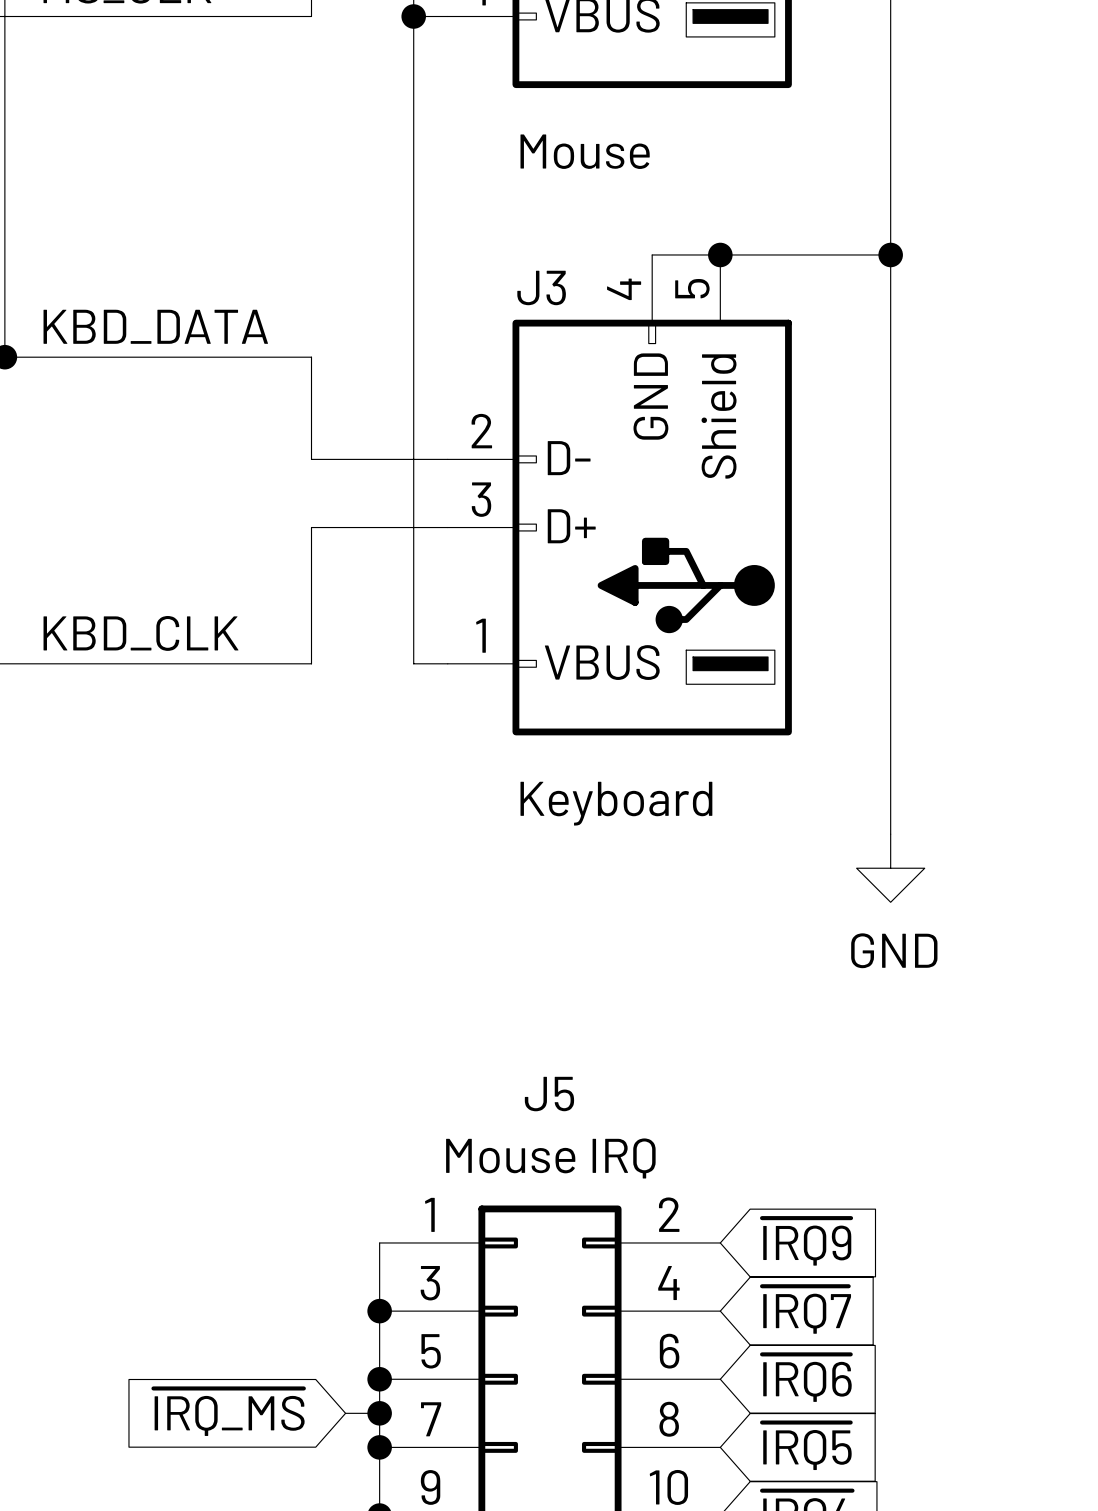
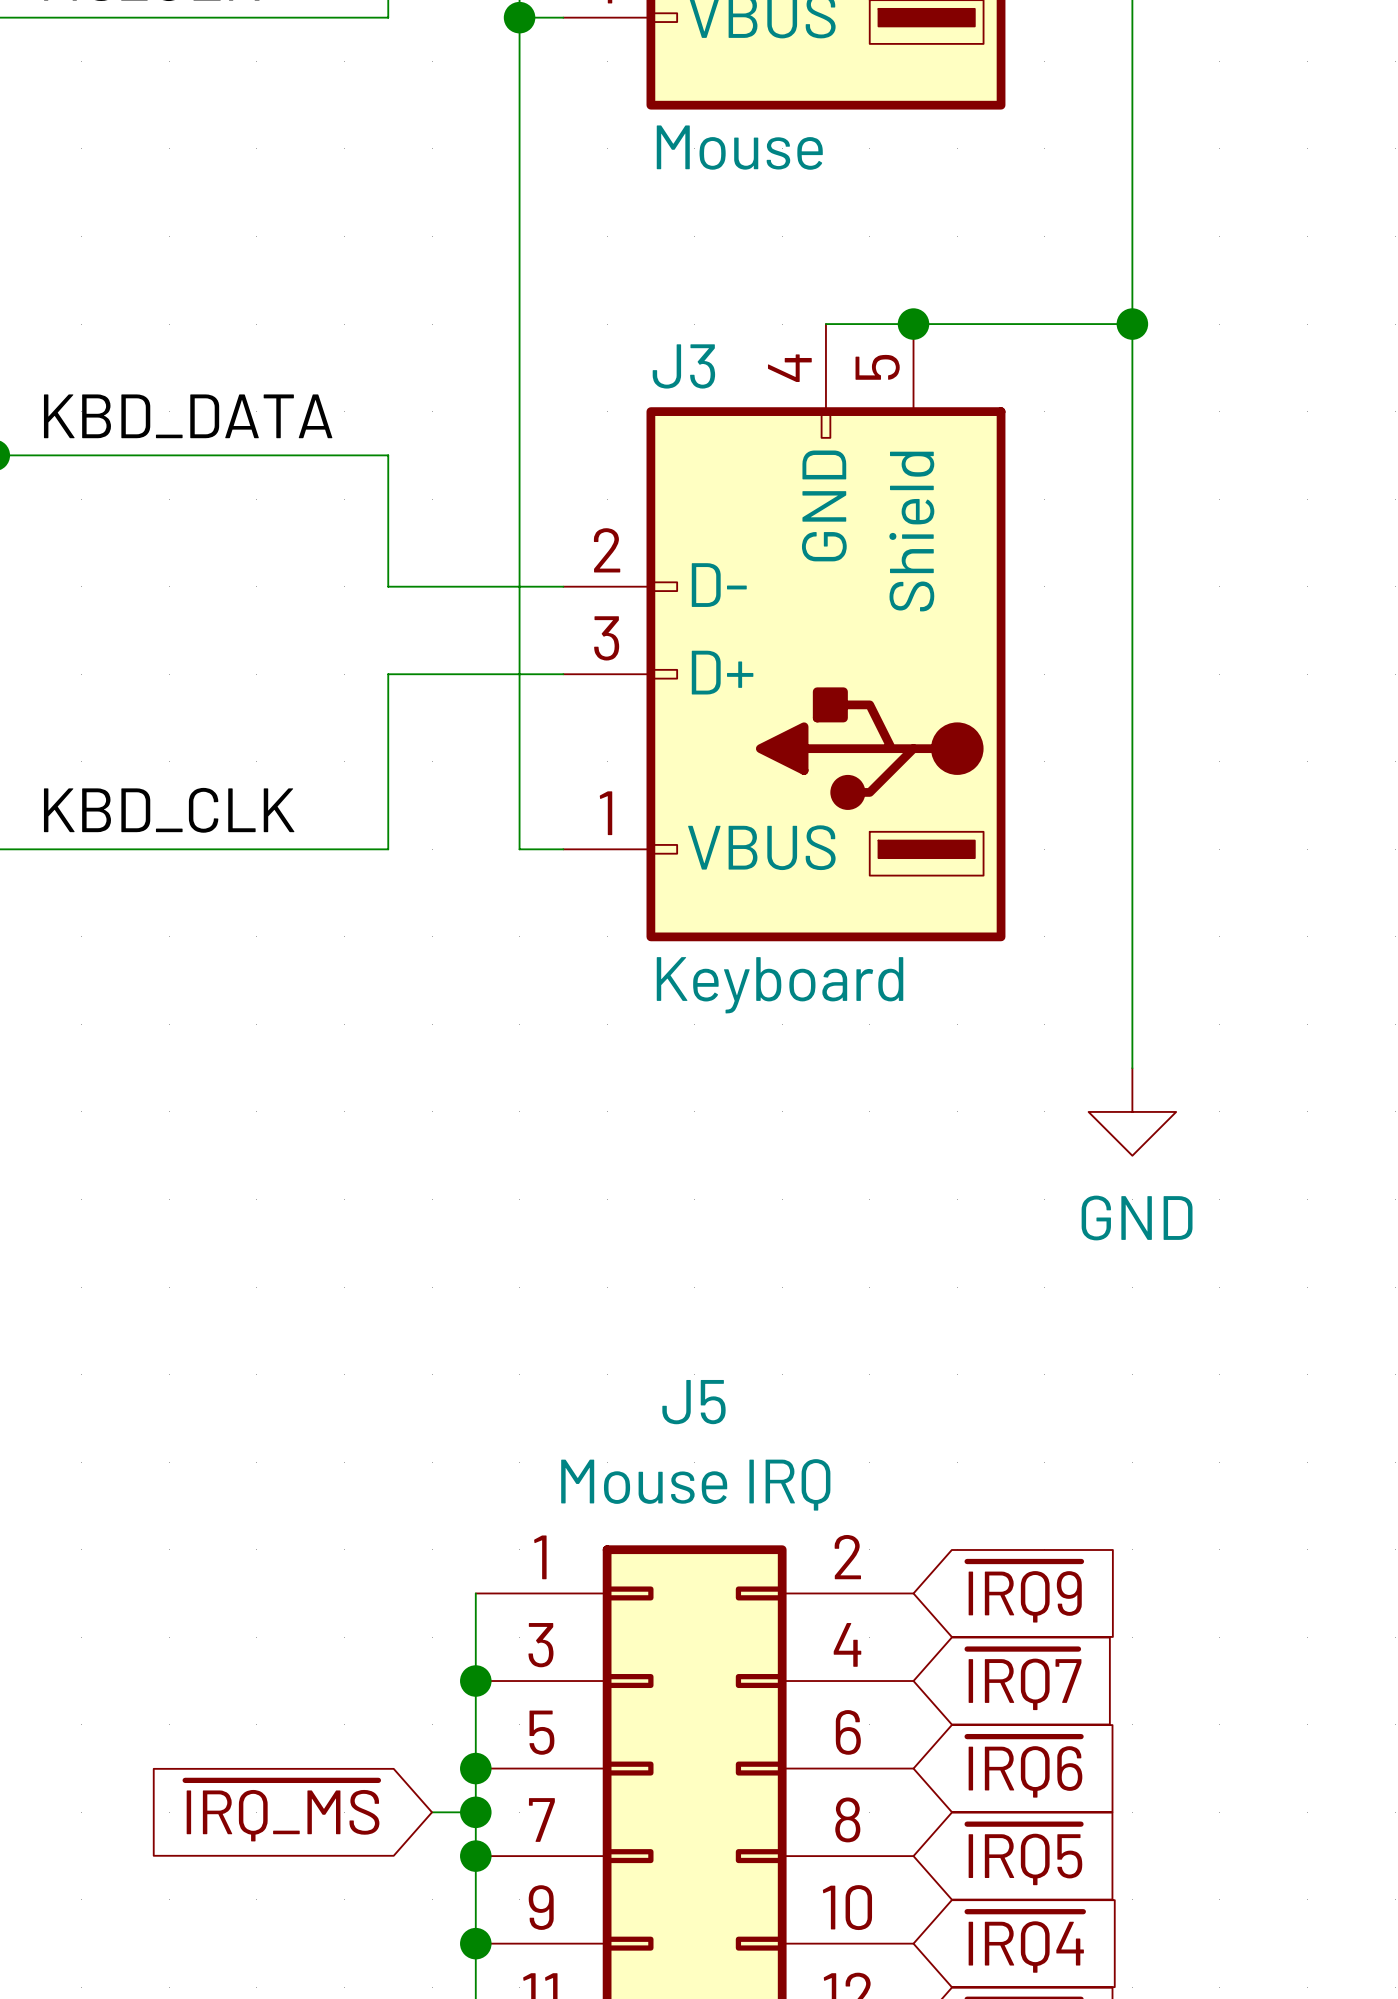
part value position: Mouse (585, 151) -> Mouse (739, 147)
J3 value position: Keyboard (616, 803) -> Keyboard (780, 985)

